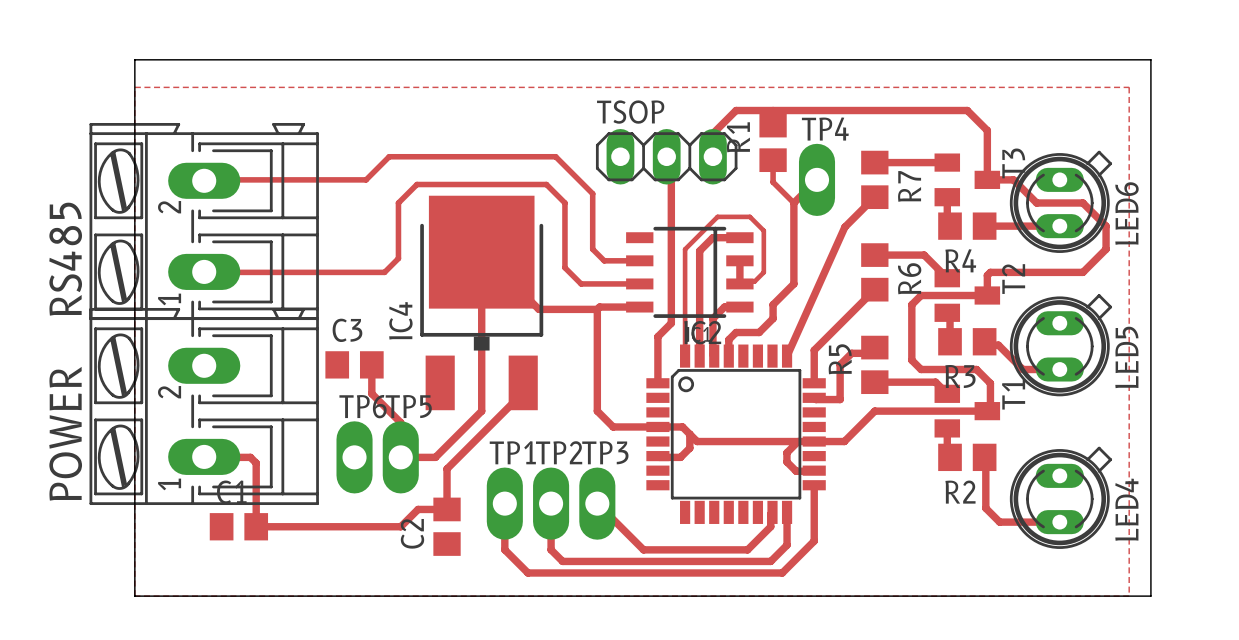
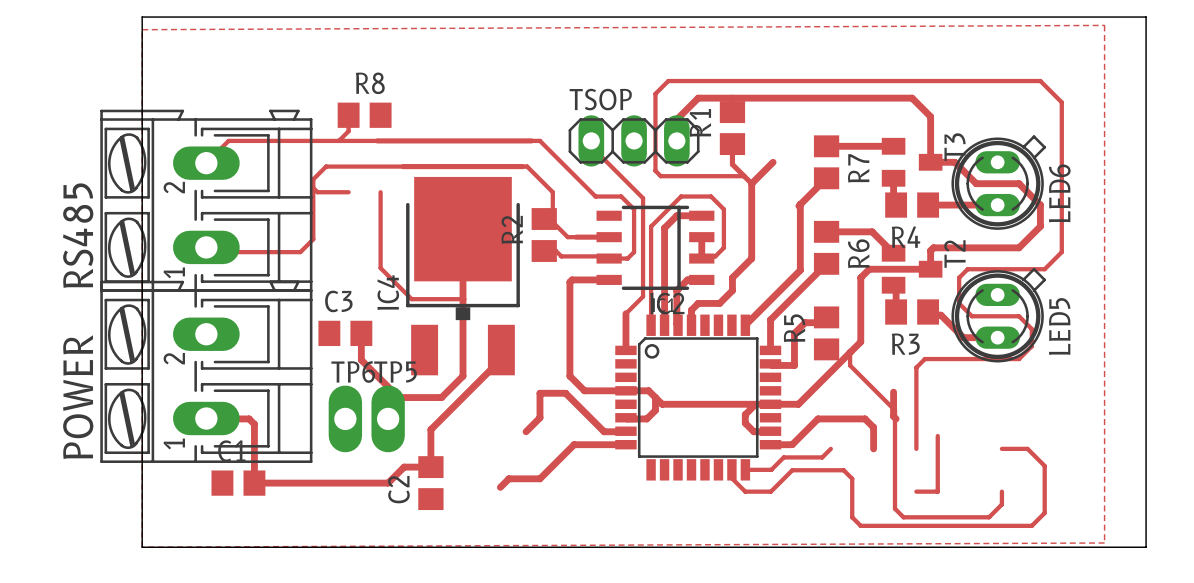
board edge: (134, 59) (1150, 59) (1150, 596) -> (142, 51) (142, 17) (1146, 17) (1146, 547) (1081, 547)
top zone outline: (134, 87) (1129, 87) (1129, 596) (134, 596) -> (142, 76) (142, 29) (1104, 25) (1104, 542) (142, 547)
top track: none -> (348, 115) (348, 131) (338, 140)
R8: none -> (364, 115)
top track: (389, 156) (366, 179) (205, 179) -> (377, 140) (228, 140) (207, 162)
top track: (555, 156) (592, 193) (592, 249) (604, 260) -> (522, 166) (527, 166) (552, 192) (552, 222) (567, 237) (576, 237)
top track: none -> (531, 140) (539, 140) (595, 196) (621, 196) (634, 209) (634, 252) (627, 258) (561, 256) (555, 251) (544, 251)
top track: (666, 156) (671, 161) (671, 323) (657, 336) (657, 343) -> (591, 140) (593, 143) (593, 149) (643, 198) (643, 296) (625, 313)
TP4: (817, 179) -> none
top track: (416, 184) (398, 203) (398, 258) (384, 272) (204, 272) -> (403, 166) (326, 166) (313, 179) (313, 239) (300, 252) (211, 252) (206, 247)
top track: (546, 184) (564, 203) (564, 267) (581, 283) (639, 283) -> none
top track: none -> (744, 176) (660, 176) (655, 170) (655, 93) (668, 81) (1040, 81) (1061, 102) (1061, 252) (1044, 269) (967, 269) (959, 277) (959, 303) (971, 316) (1019, 316) (1031, 329) (1031, 346) (1019, 359) (924, 359) (916, 367) (916, 448)
top track: none -> (313, 187) (317, 192) (348, 192)
top track: none -> (380, 192) (380, 268) (411, 299) (462, 299)
top track: (844, 227) (787, 356) -> (800, 204) (800, 270) (745, 325)
top track: (481, 252) (538, 309) (597, 309) -> none
top track: (911, 360) (921, 369) (976, 369) (990, 383) (990, 408) (987, 411) (874, 411) -> (860, 329) (860, 341) (826, 376)
top track: (874, 382) (935, 382) (947, 393) -> none
top track: none -> (850, 352) (850, 365) (894, 410) (894, 508) (903, 517) (989, 517) (1001, 504) (1001, 491)
T1: (967, 411) -> none
top track: (400, 422) (400, 457) (435, 457) (458, 434) -> (388, 386) (398, 397) (441, 397)
R2 rotation: 0° (967, 457) -> 90° clockwise (544, 235)
R2 position: (967, 457) -> (544, 235)
top track: (984, 457) (985, 508) (999, 522) (1059, 522) -> none
top track: none -> (625, 431) (604, 431) (565, 393) (539, 393) (539, 417) (526, 431)
top track: none -> (937, 436) (937, 491) (916, 491)
top track: none -> (625, 444) (574, 444) (539, 478) (508, 478) (500, 487)
top track: (814, 485) (814, 541) (782, 572) (527, 572) (504, 549) (504, 503) -> (770, 444) (792, 444) (818, 418) (865, 418) (873, 427) (873, 448)
LED4: (1060, 497) -> none
TP1: (504, 503) -> none
top track: (551, 503) (551, 549) (562, 561) (770, 561) (787, 545) (787, 512) -> (830, 448) (822, 457) (783, 457) (771, 469) (745, 469)
TP2: (551, 503) -> none
top track: (597, 503) (643, 549) (747, 549) (770, 526) (770, 514) (772, 512) -> (1001, 448) (1027, 448) (1044, 465) (1044, 513) (1031, 525) (860, 525) (852, 517) (852, 478) (843, 470) (792, 470) (770, 491) (745, 491) (731, 478) (731, 469)
TP3: (597, 503) -> none

